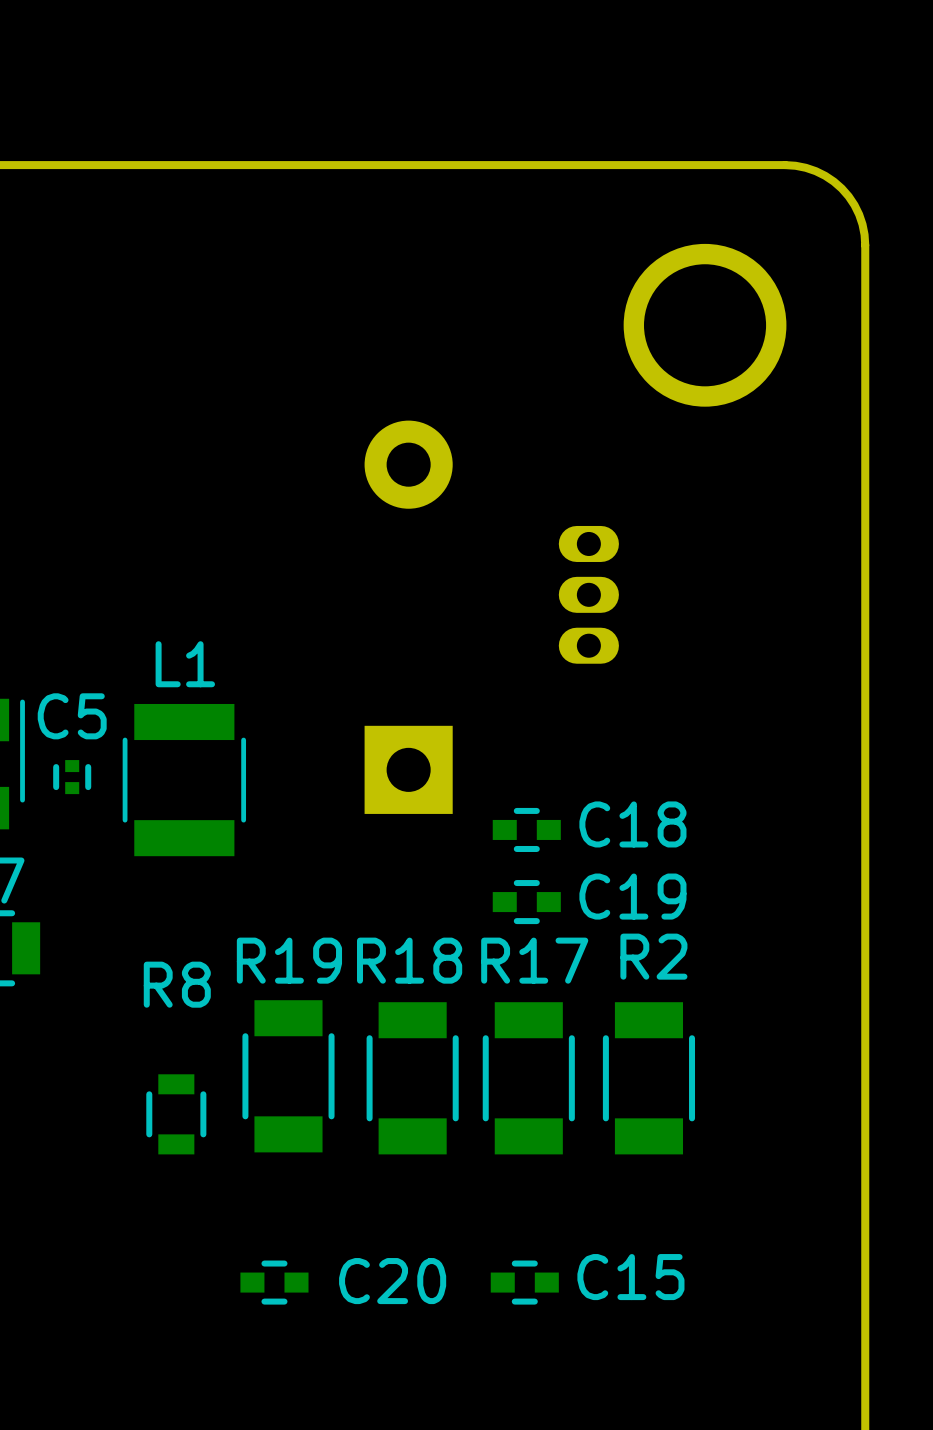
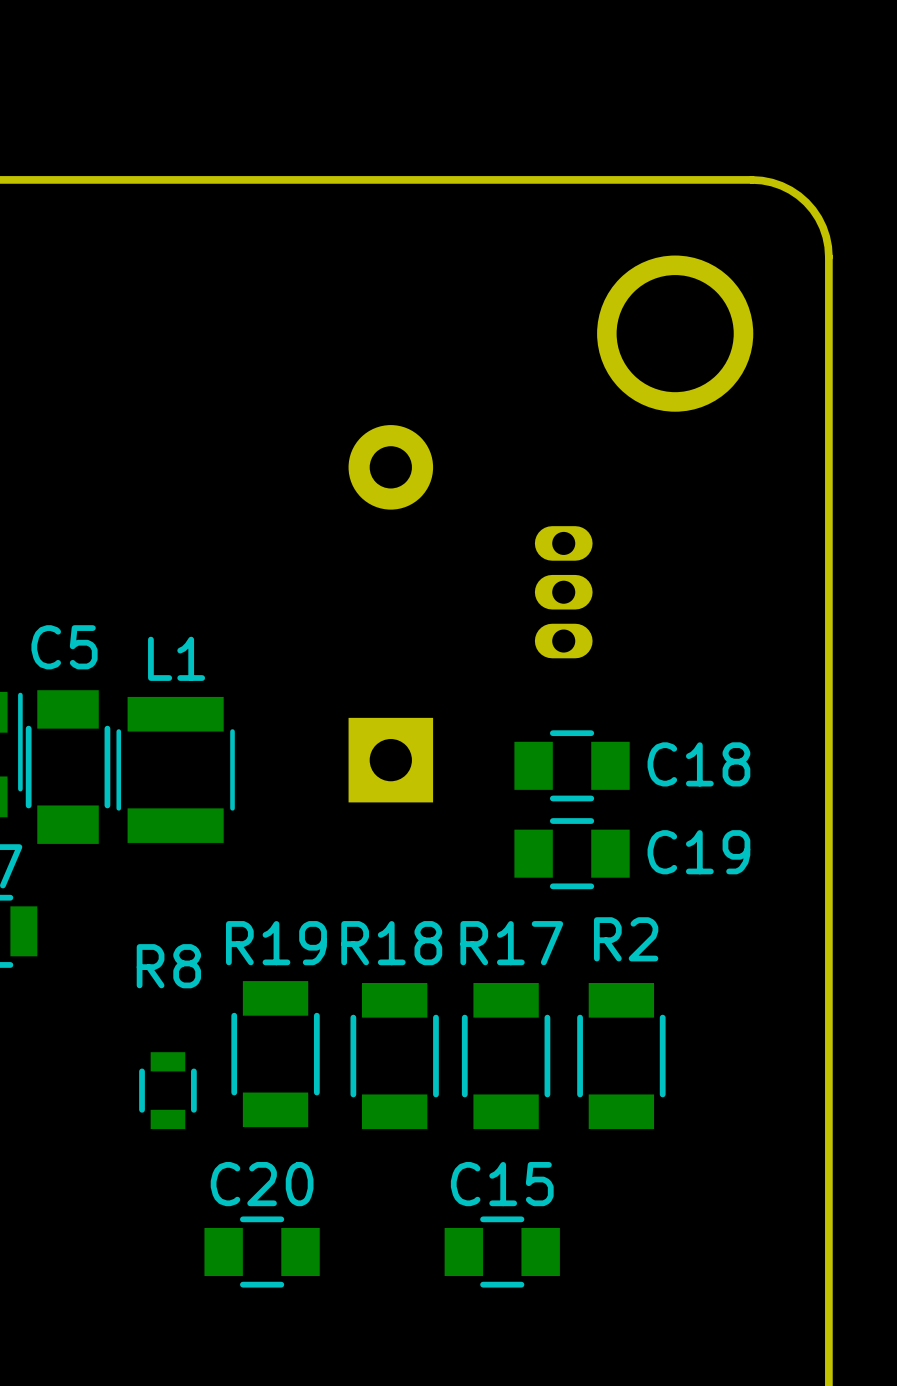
C5 footprint: [53, 760, 92, 795] -> [25, 690, 111, 844]
C18 footprint: [492, 807, 561, 852] -> [514, 730, 630, 802]
C19 footprint: [492, 880, 561, 925] -> [514, 818, 630, 890]
C20 footprint: [240, 1260, 309, 1305] -> [204, 1216, 320, 1288]
C15 footprint: [490, 1260, 559, 1305] -> [444, 1216, 560, 1288]
C15 name position: C15 (630, 1277) -> C15 (502, 1184)
C20 name position: C20 (392, 1281) -> C20 (262, 1184)

